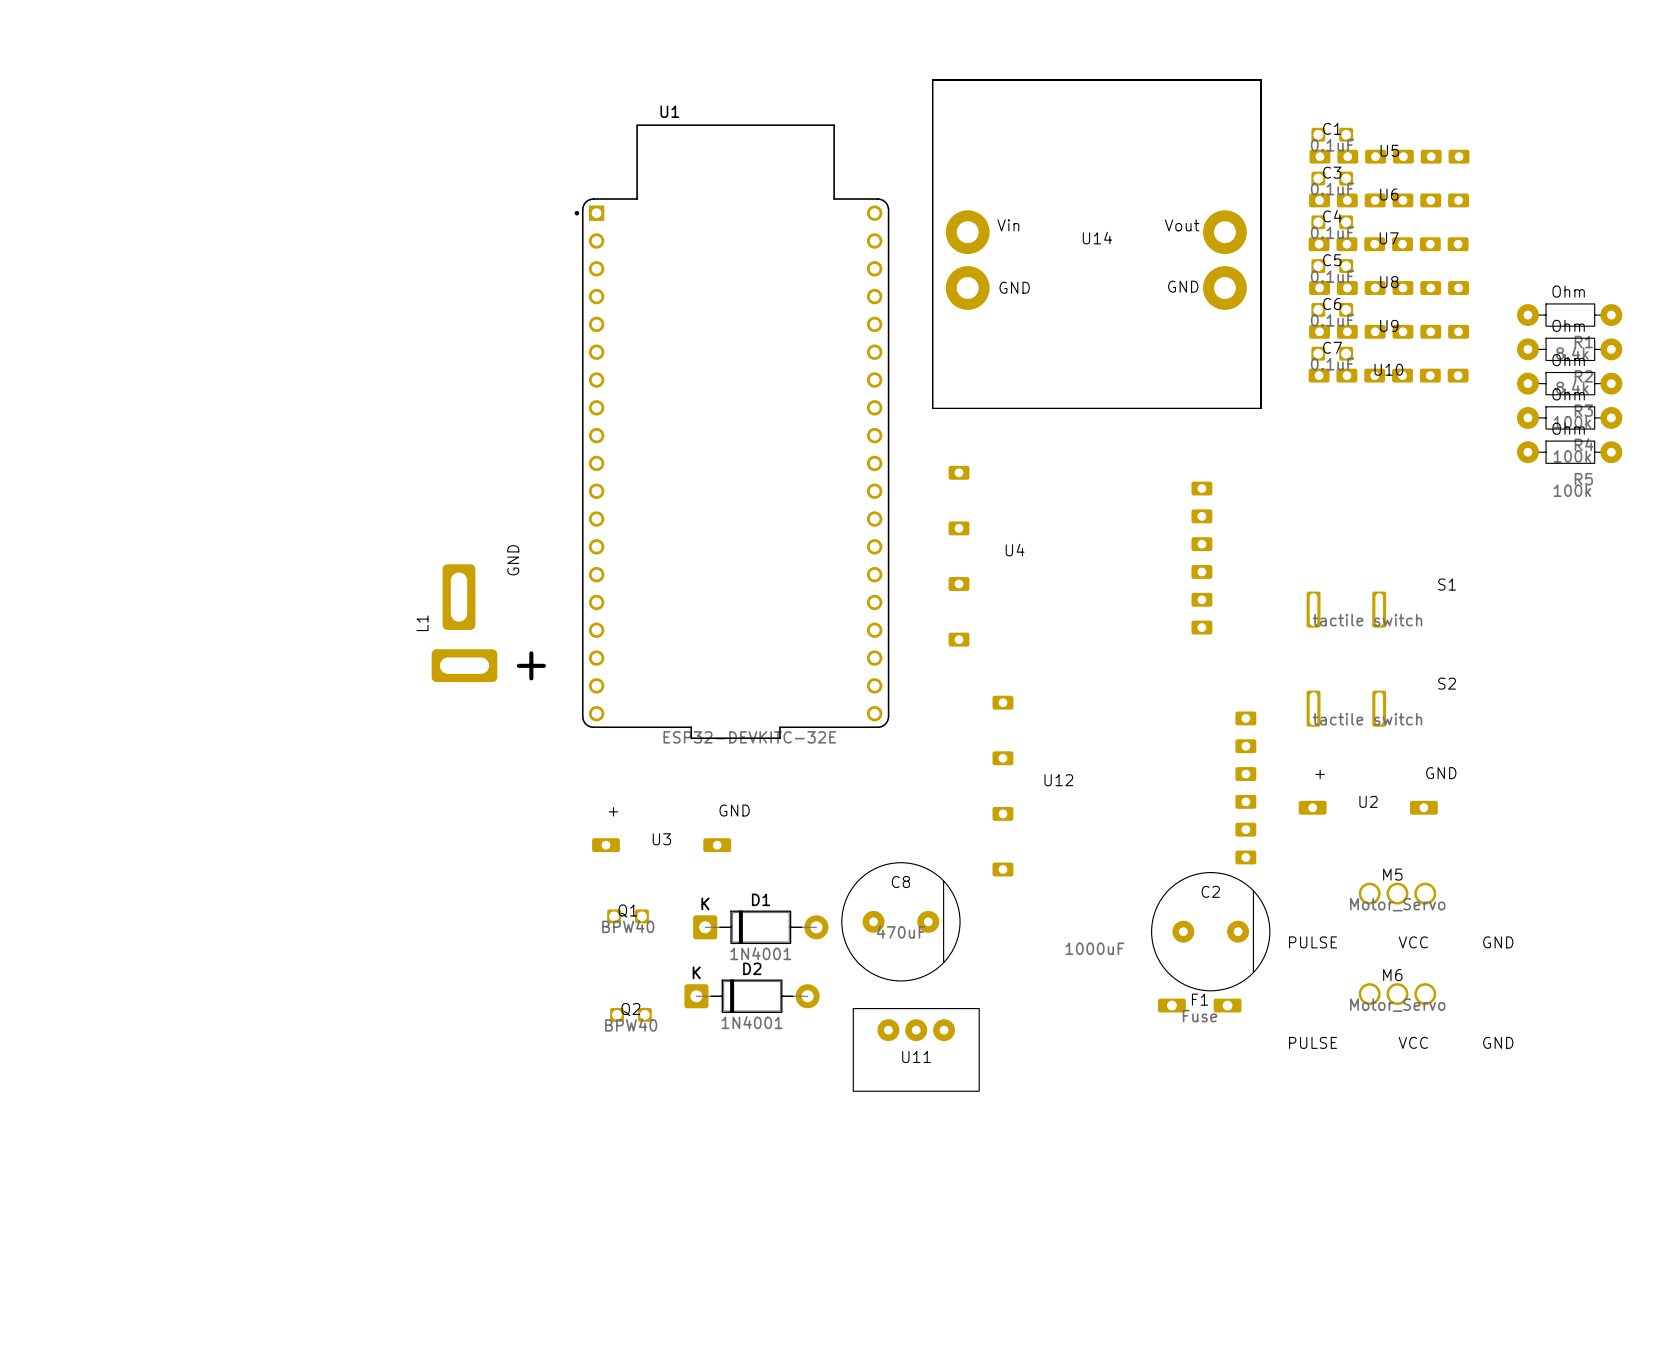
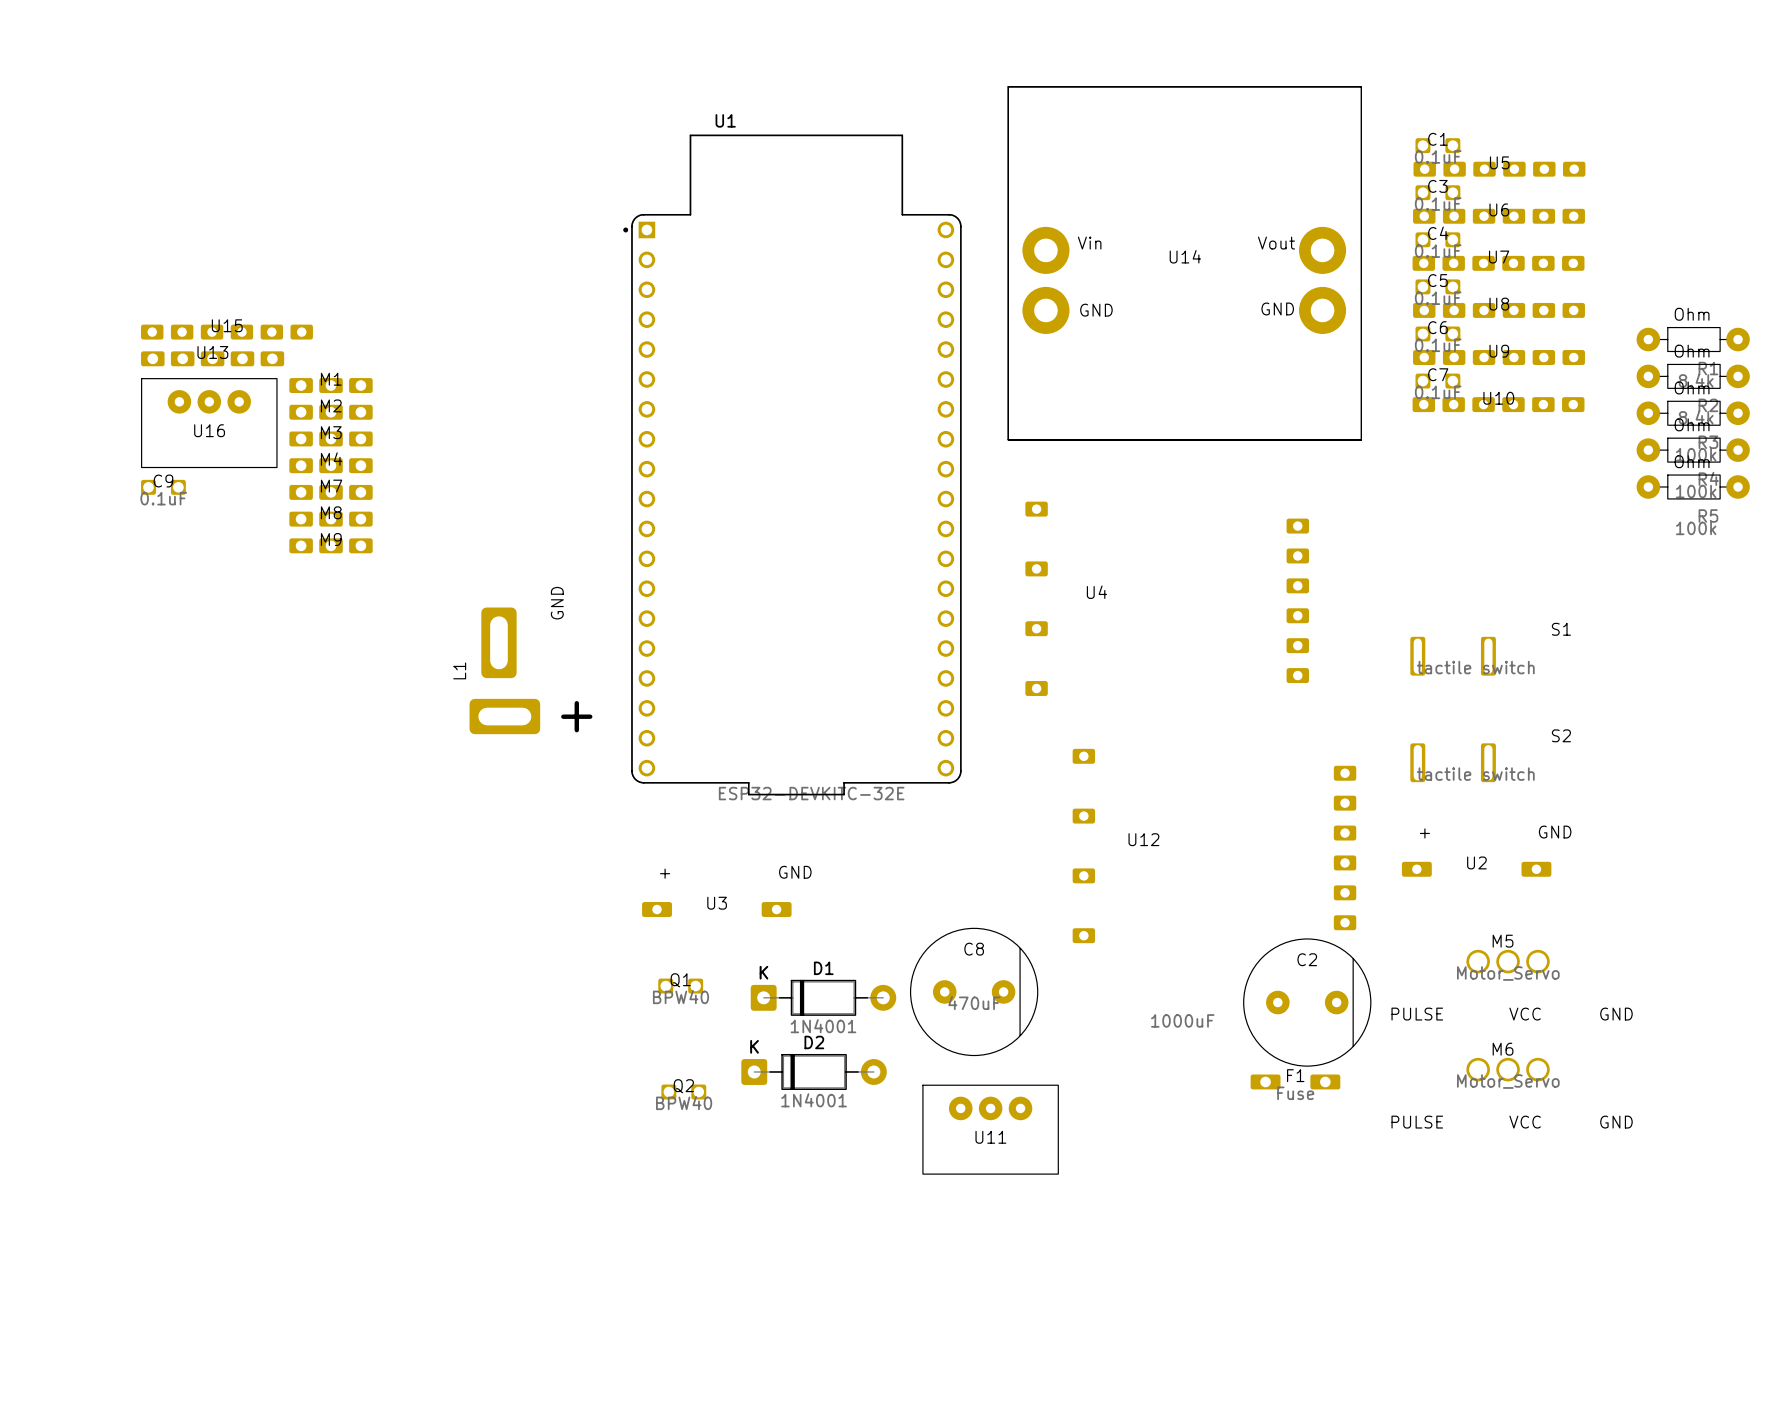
U15: none -> (226, 332)
U13: none -> (212, 358)
M1: none -> (331, 385)
M2: none -> (331, 412)
U16: none -> (209, 423)
M3: none -> (331, 438)
M4: none -> (331, 465)
C9: none -> 0.1uF (163, 487)
M7: none -> (331, 492)
M8: none -> (331, 519)
M9: none -> (331, 545)

